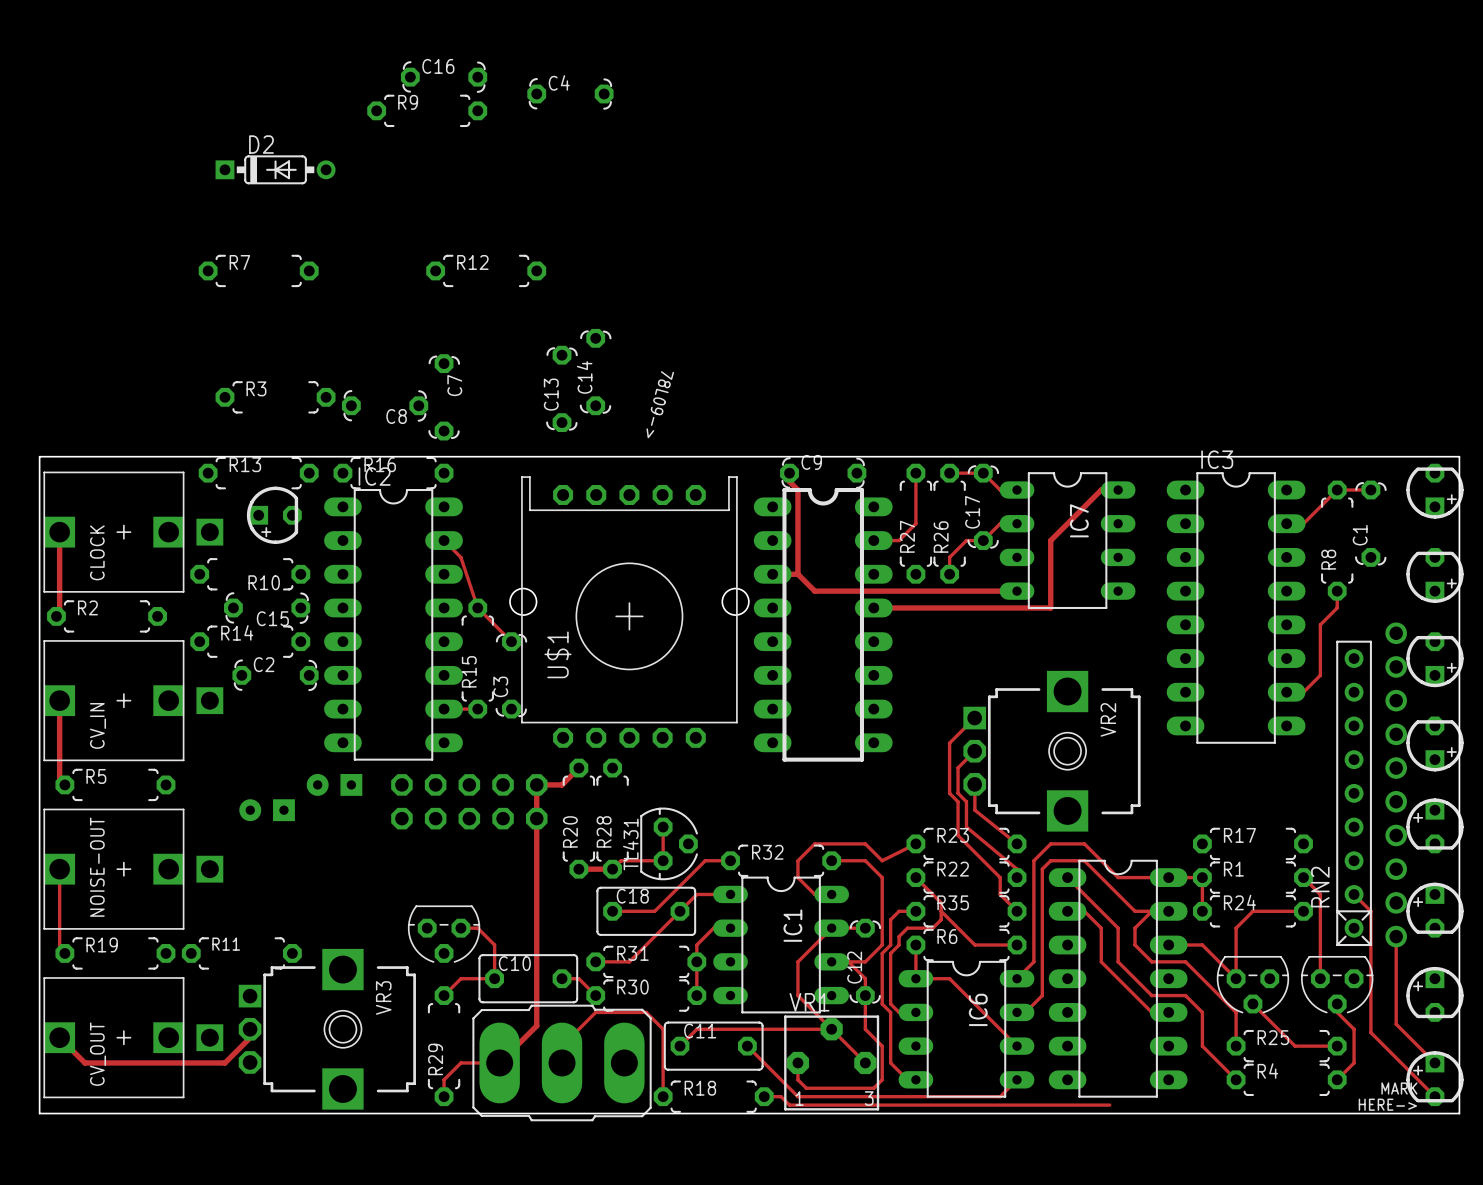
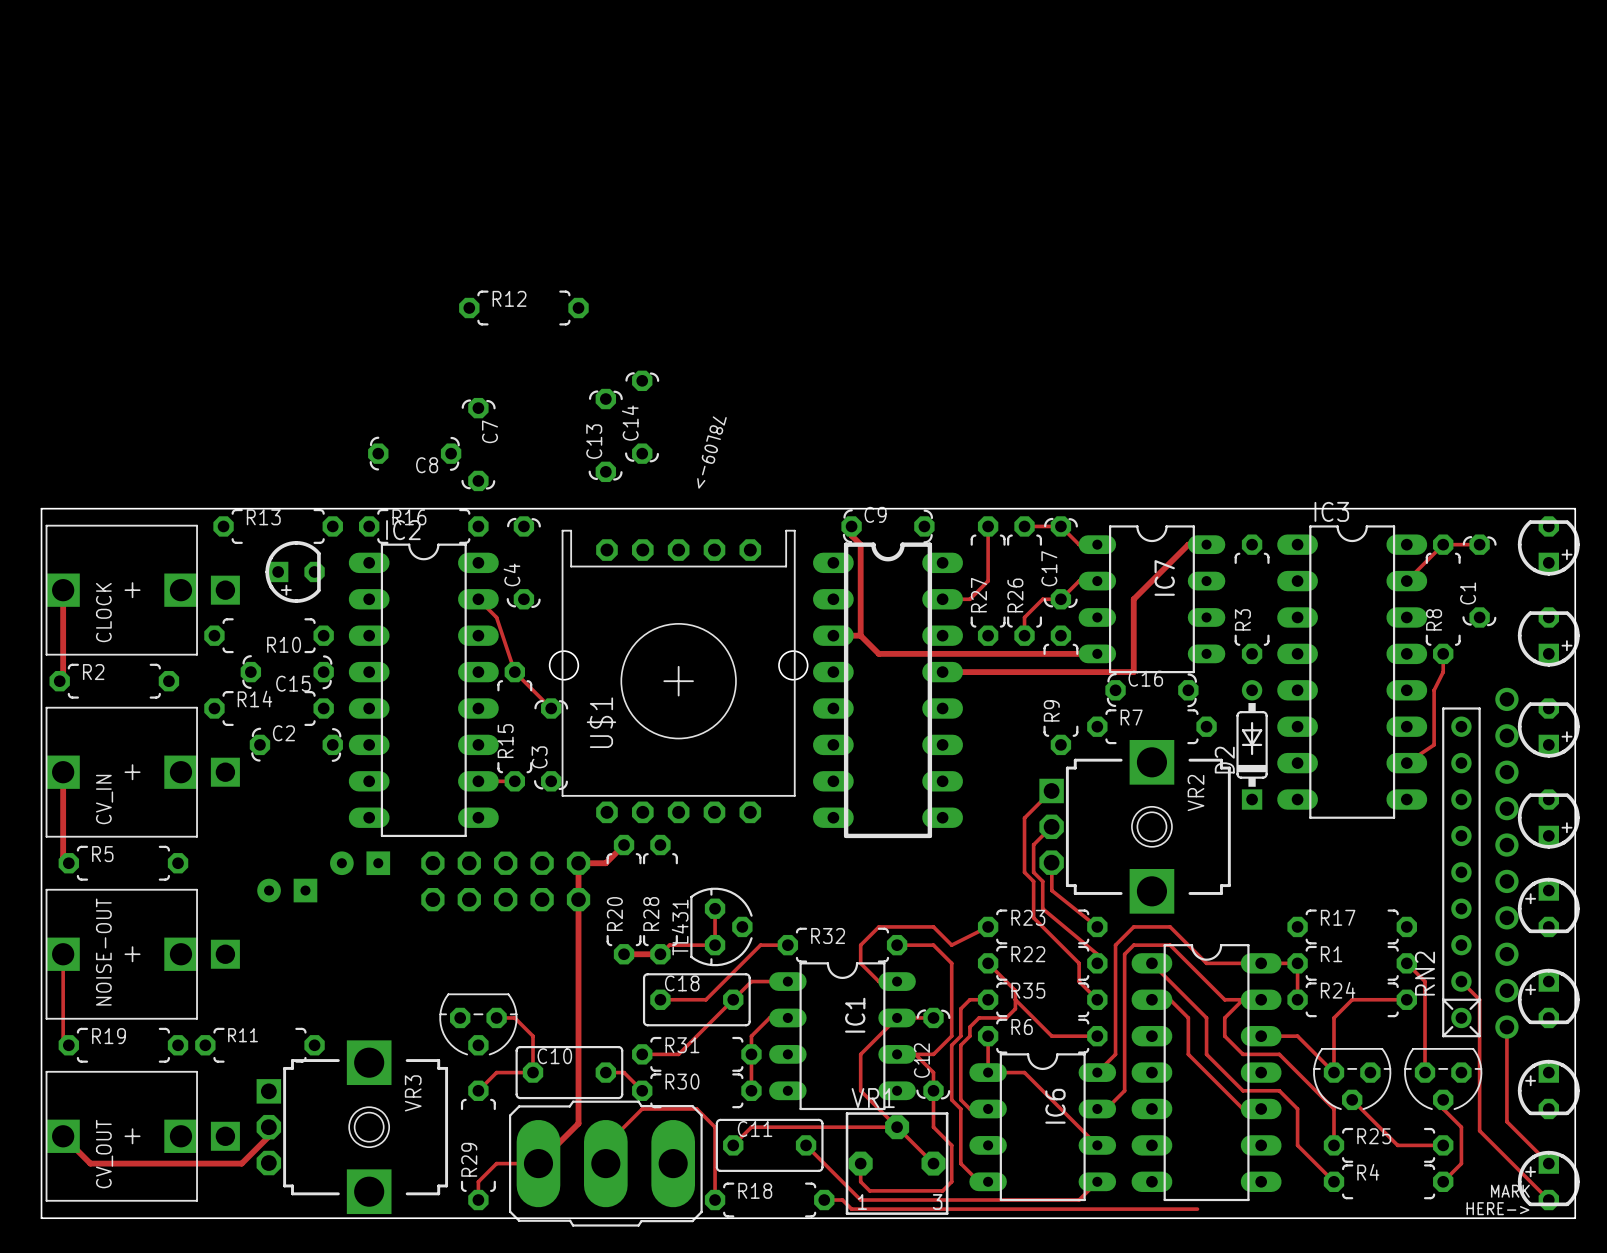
C16 position: (444, 77) -> (1151, 690)
C4 rotation: 0° (570, 93) -> 90° clockwise (523, 562)
C4 position: (570, 93) -> (523, 562)
R9 rotation: 0° (427, 110) -> 90° clockwise (1060, 690)
R9 position: (427, 110) -> (1060, 690)
D2 rotation: 0° (275, 169) -> 90° counterclockwise (1252, 744)
D2 position: (275, 169) -> (1252, 744)
R7 position: (258, 270) -> (1151, 726)
R3 rotation: 0° (275, 397) -> 90° clockwise (1252, 599)
R3 position: (275, 397) -> (1252, 599)
IC3 position: (1236, 607) -> (1352, 672)
track: (1337, 607) (1320, 624) (1320, 675) (1303, 692) (1286, 692) -> (1443, 672) (1434, 690) (1434, 744) (1406, 763)

